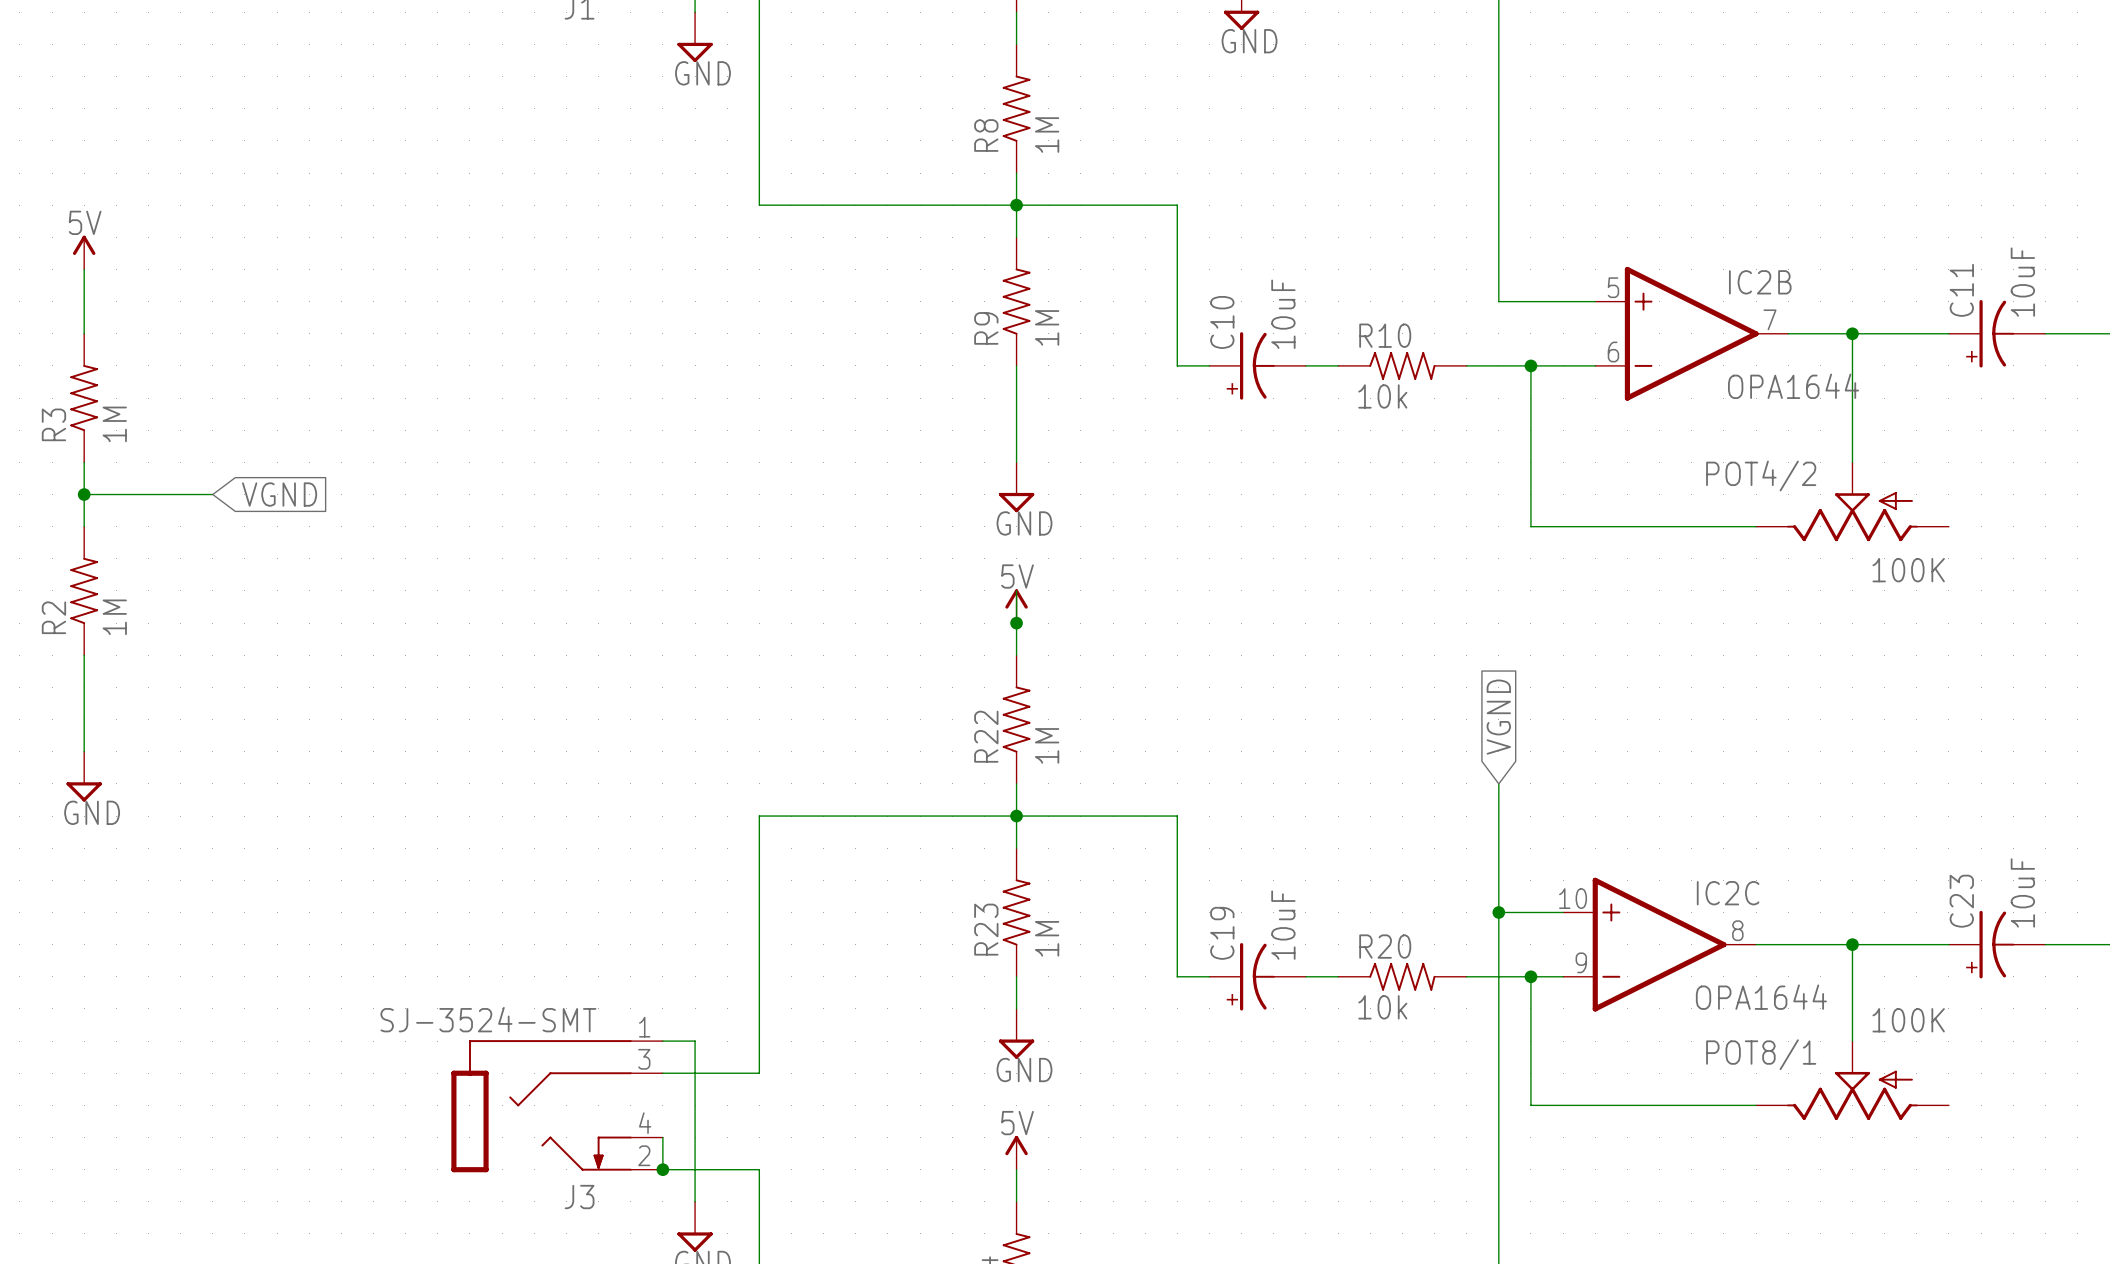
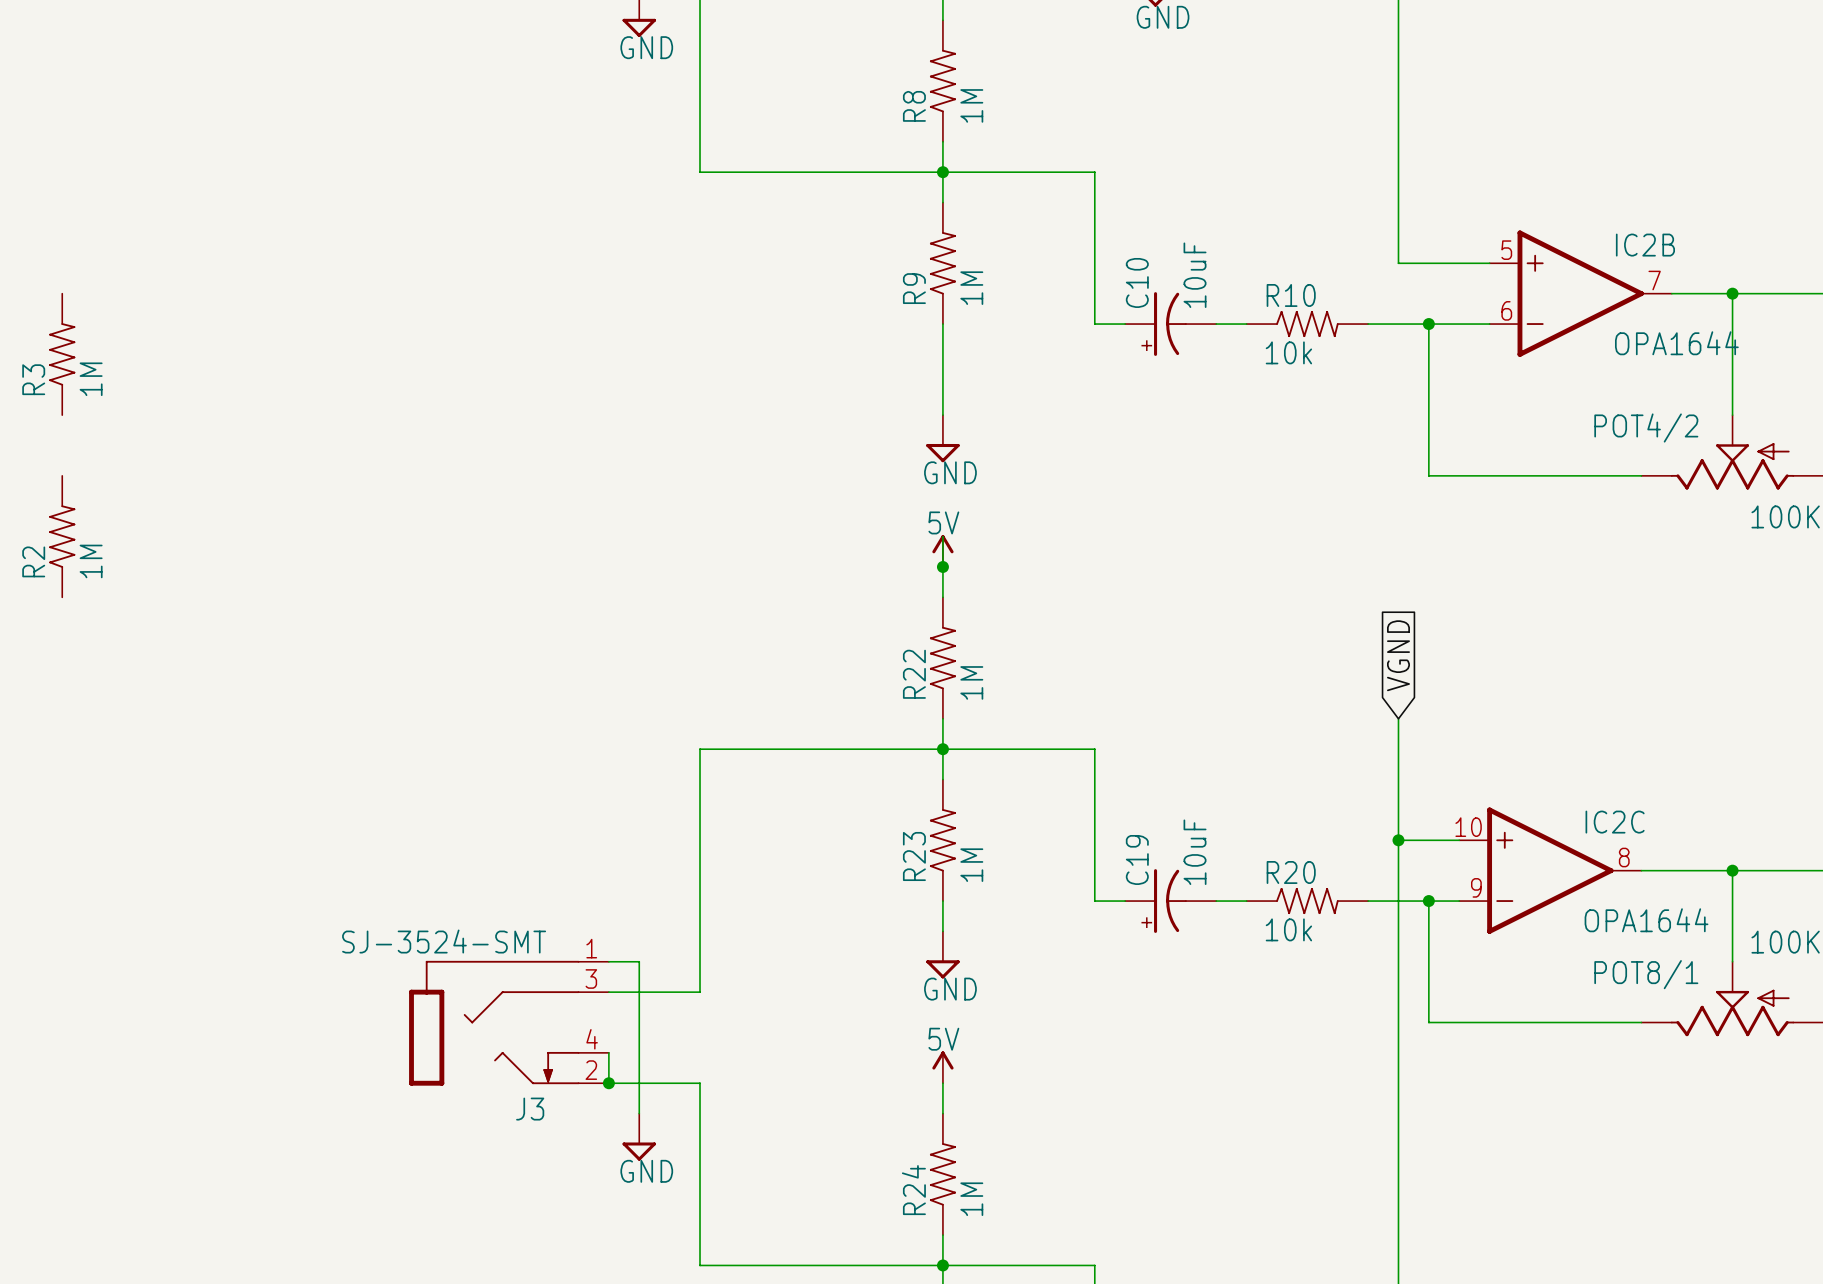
power symbol: 5V (84, 252) -> none
wire: (84, 269) (84, 333) -> none
wire: (84, 462) (84, 526) -> none
wire: (84, 494) (212, 494) -> none
junction: (84, 494) -> none
global label: VGND (279, 494) -> none
wire: (84, 655) (84, 751) -> none
power symbol: GND (84, 776) -> none

